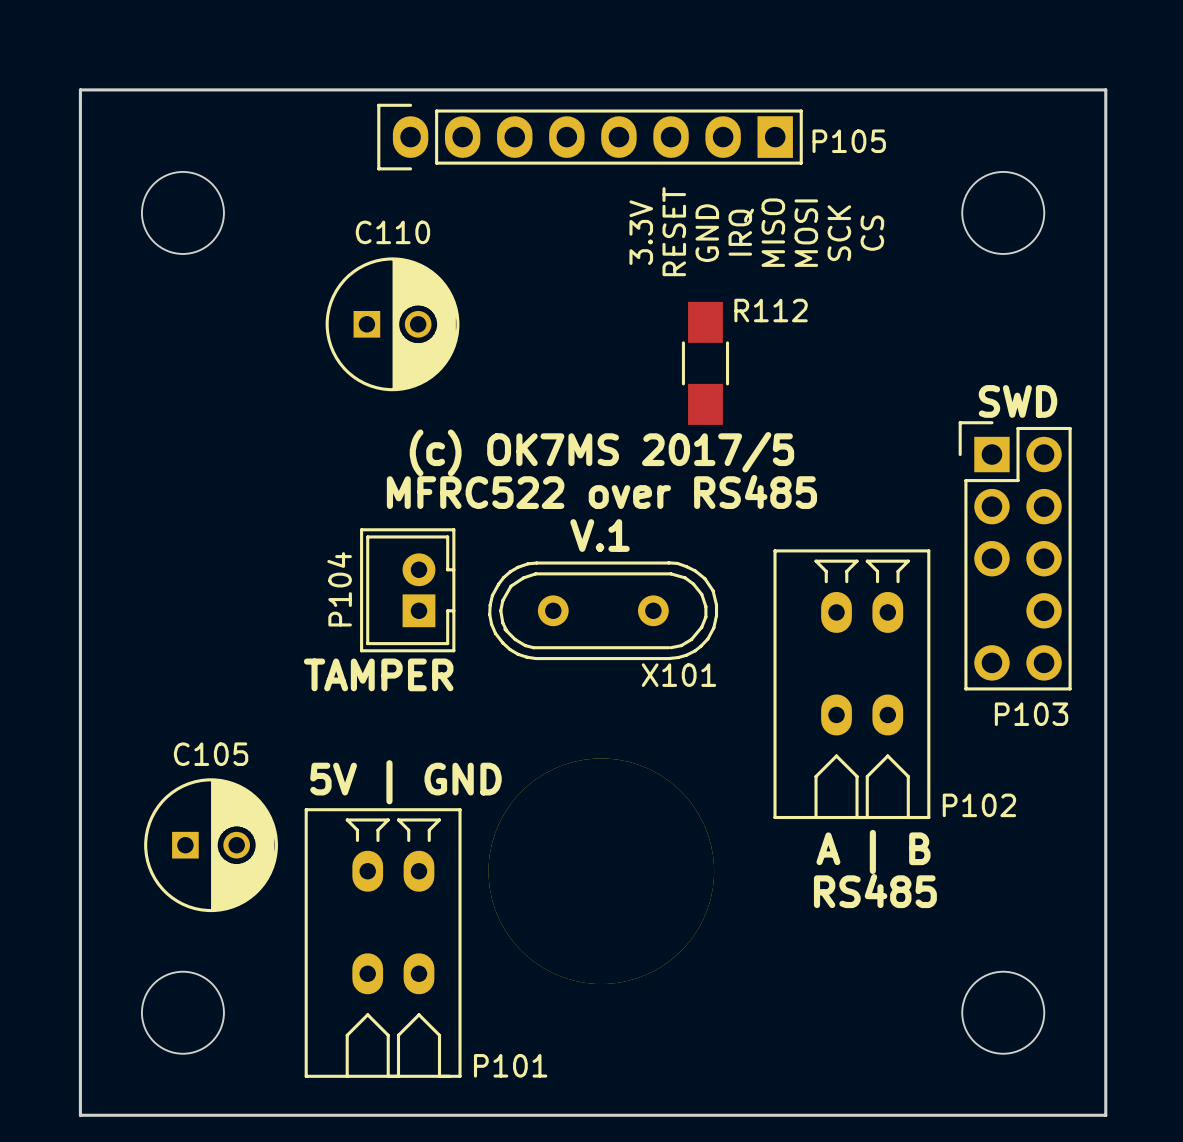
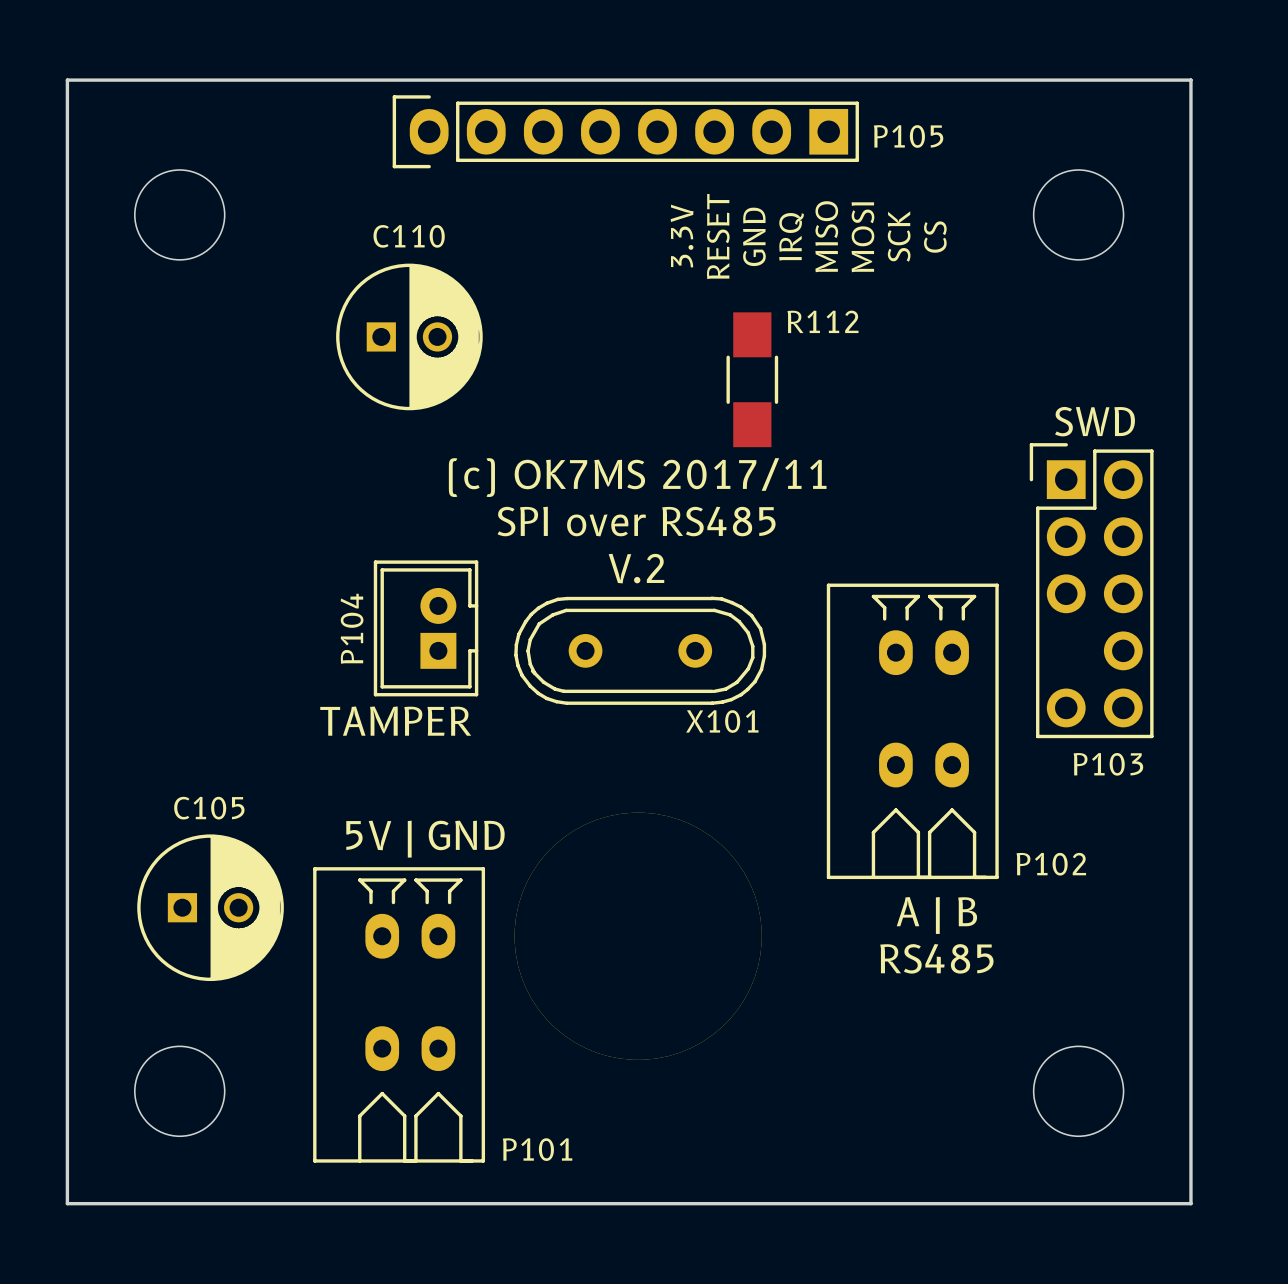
text: (c) OK7MS 2017/5 (601, 452) -> (c) OK7MS 2017/11 (637, 477)
text: MFRC522 over RS485 (601, 491) -> SPI over RS485 (636, 521)
text: V.1 (600, 535) -> V.2 (636, 568)

